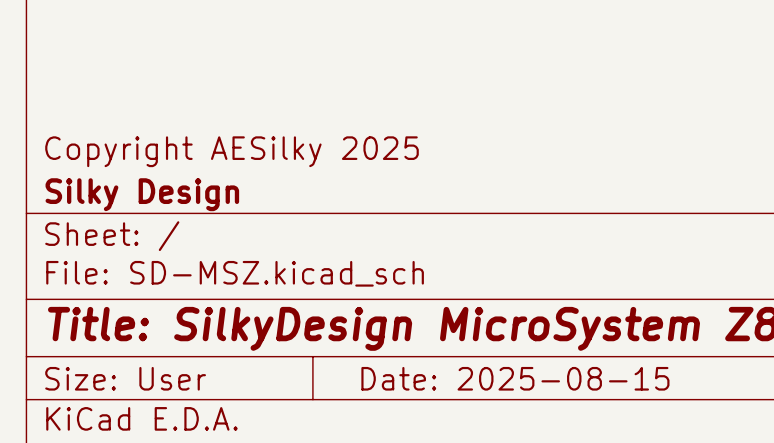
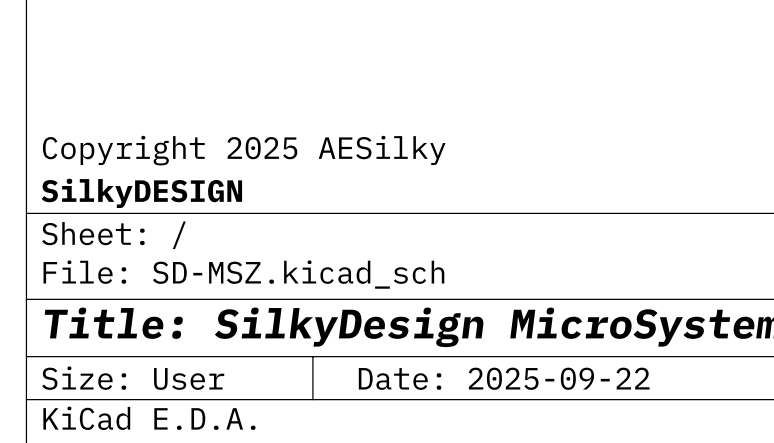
title block: Copyright AESilky 2025 (232, 151) -> Copyright 2025 AESilky (244, 150)
title block: Silky Design (142, 194) -> SilkyDESIGN (141, 193)
title block: Date: 2025-08-15 (515, 378) -> Date: 2025-09-22 (504, 378)

